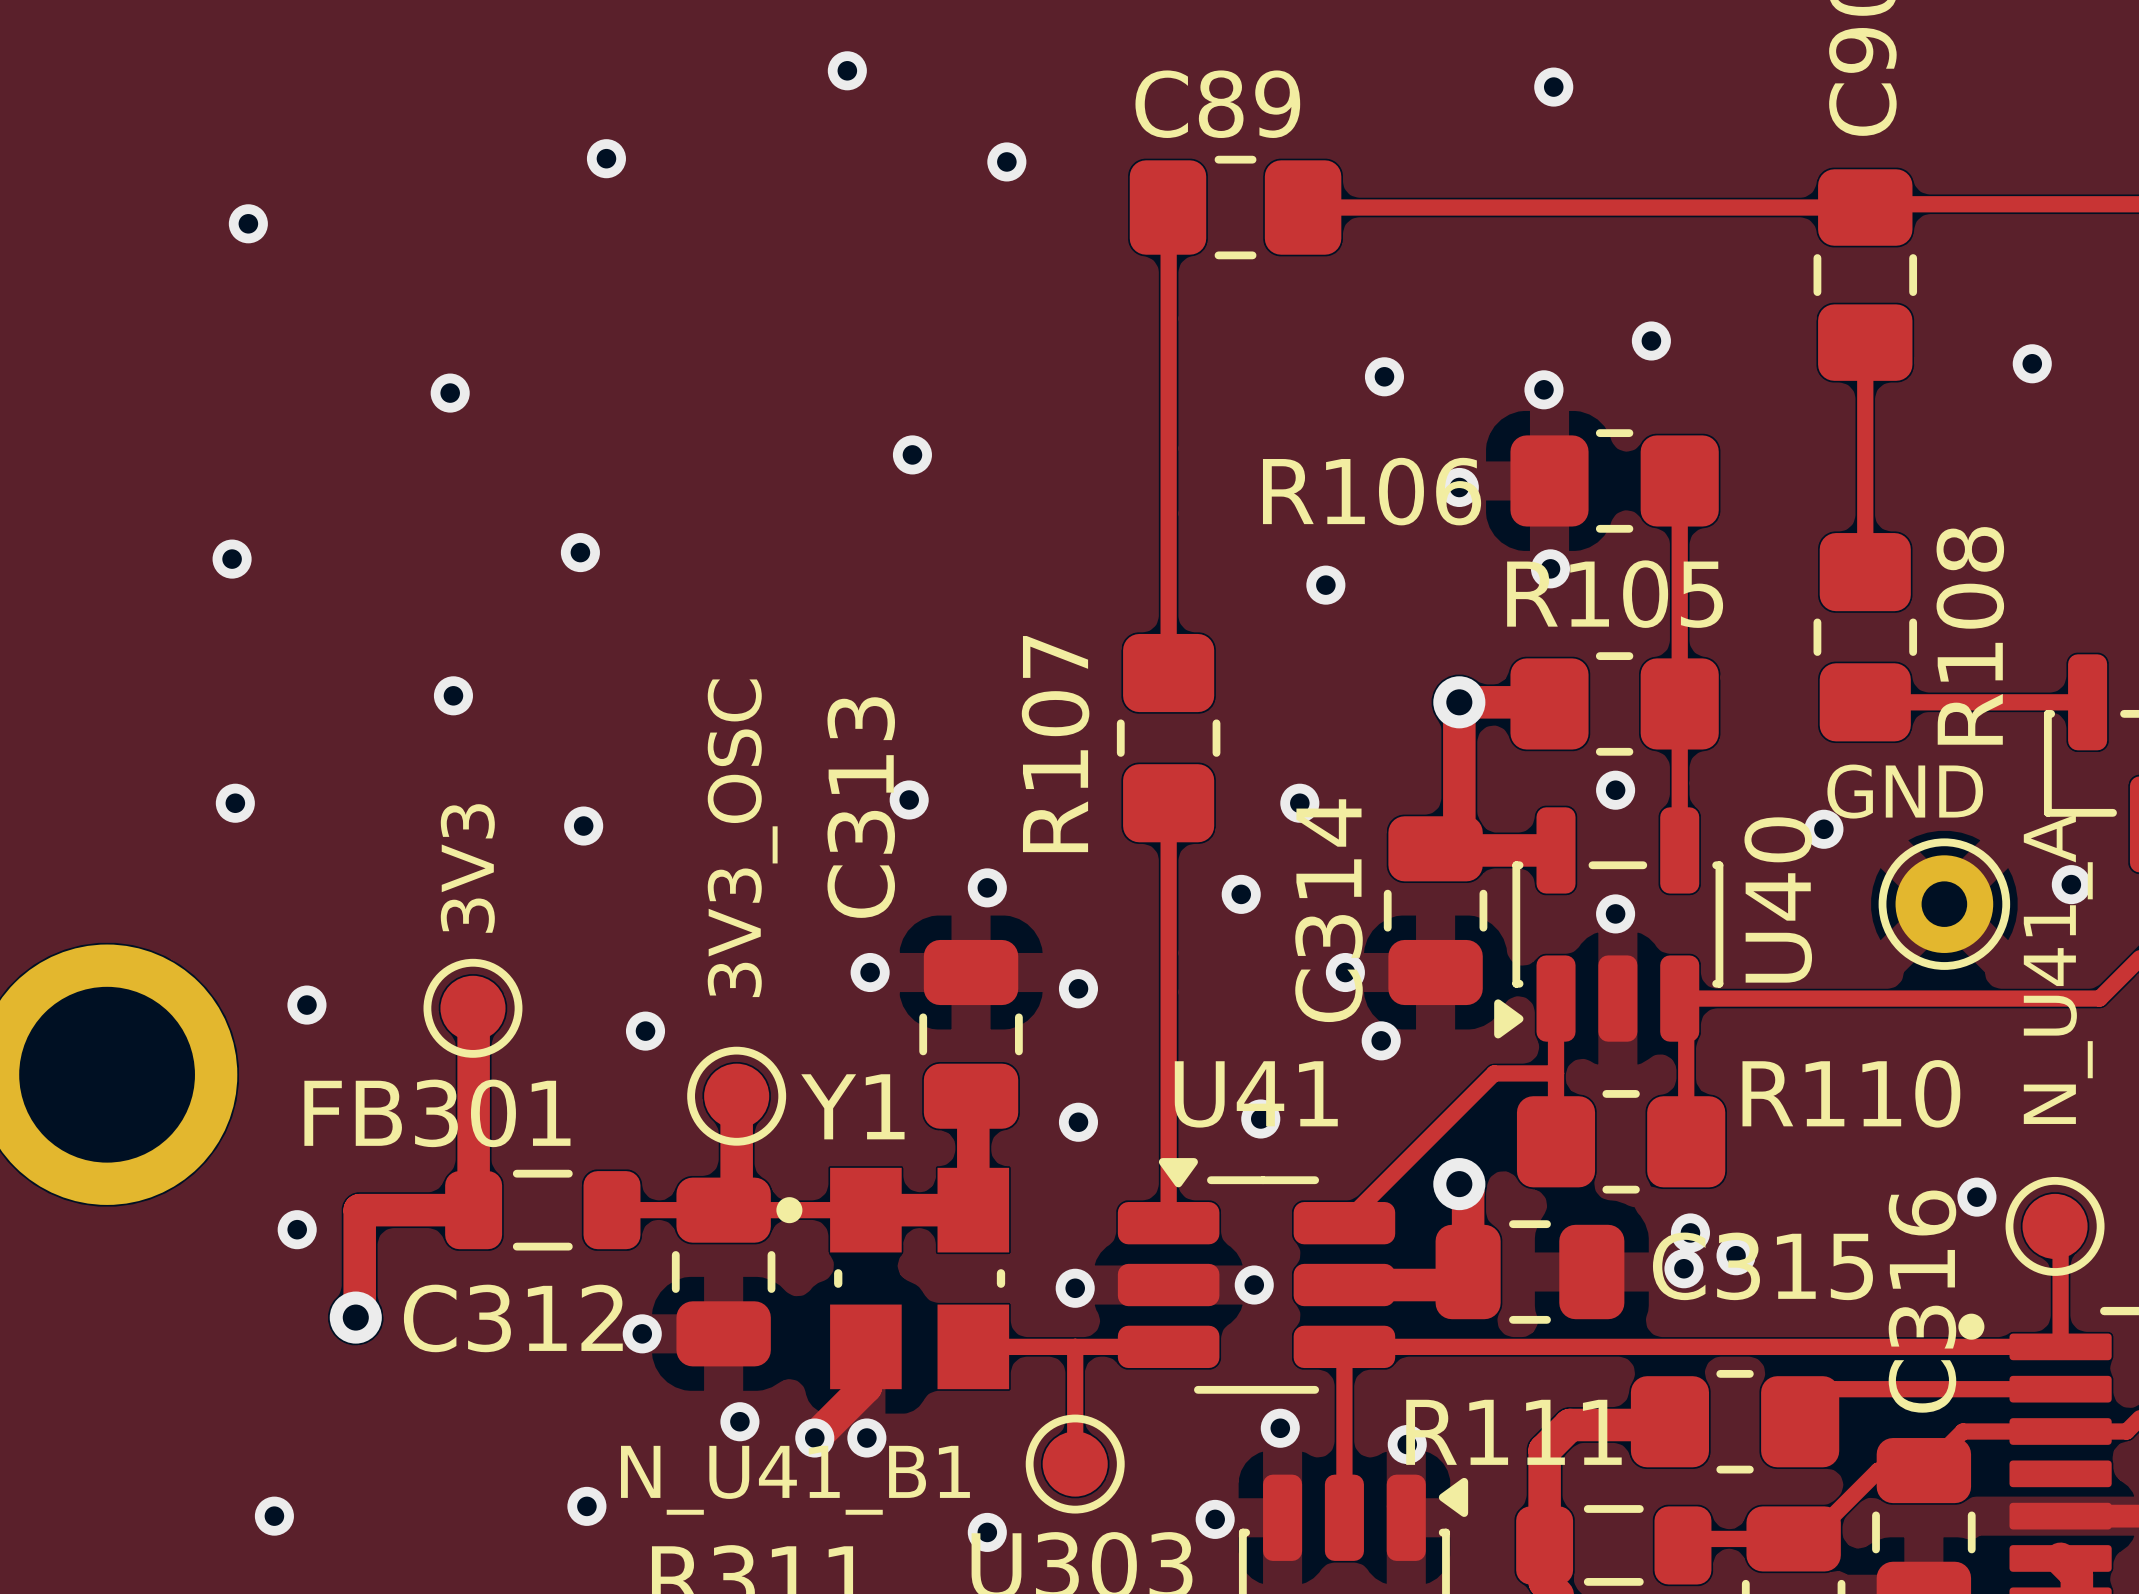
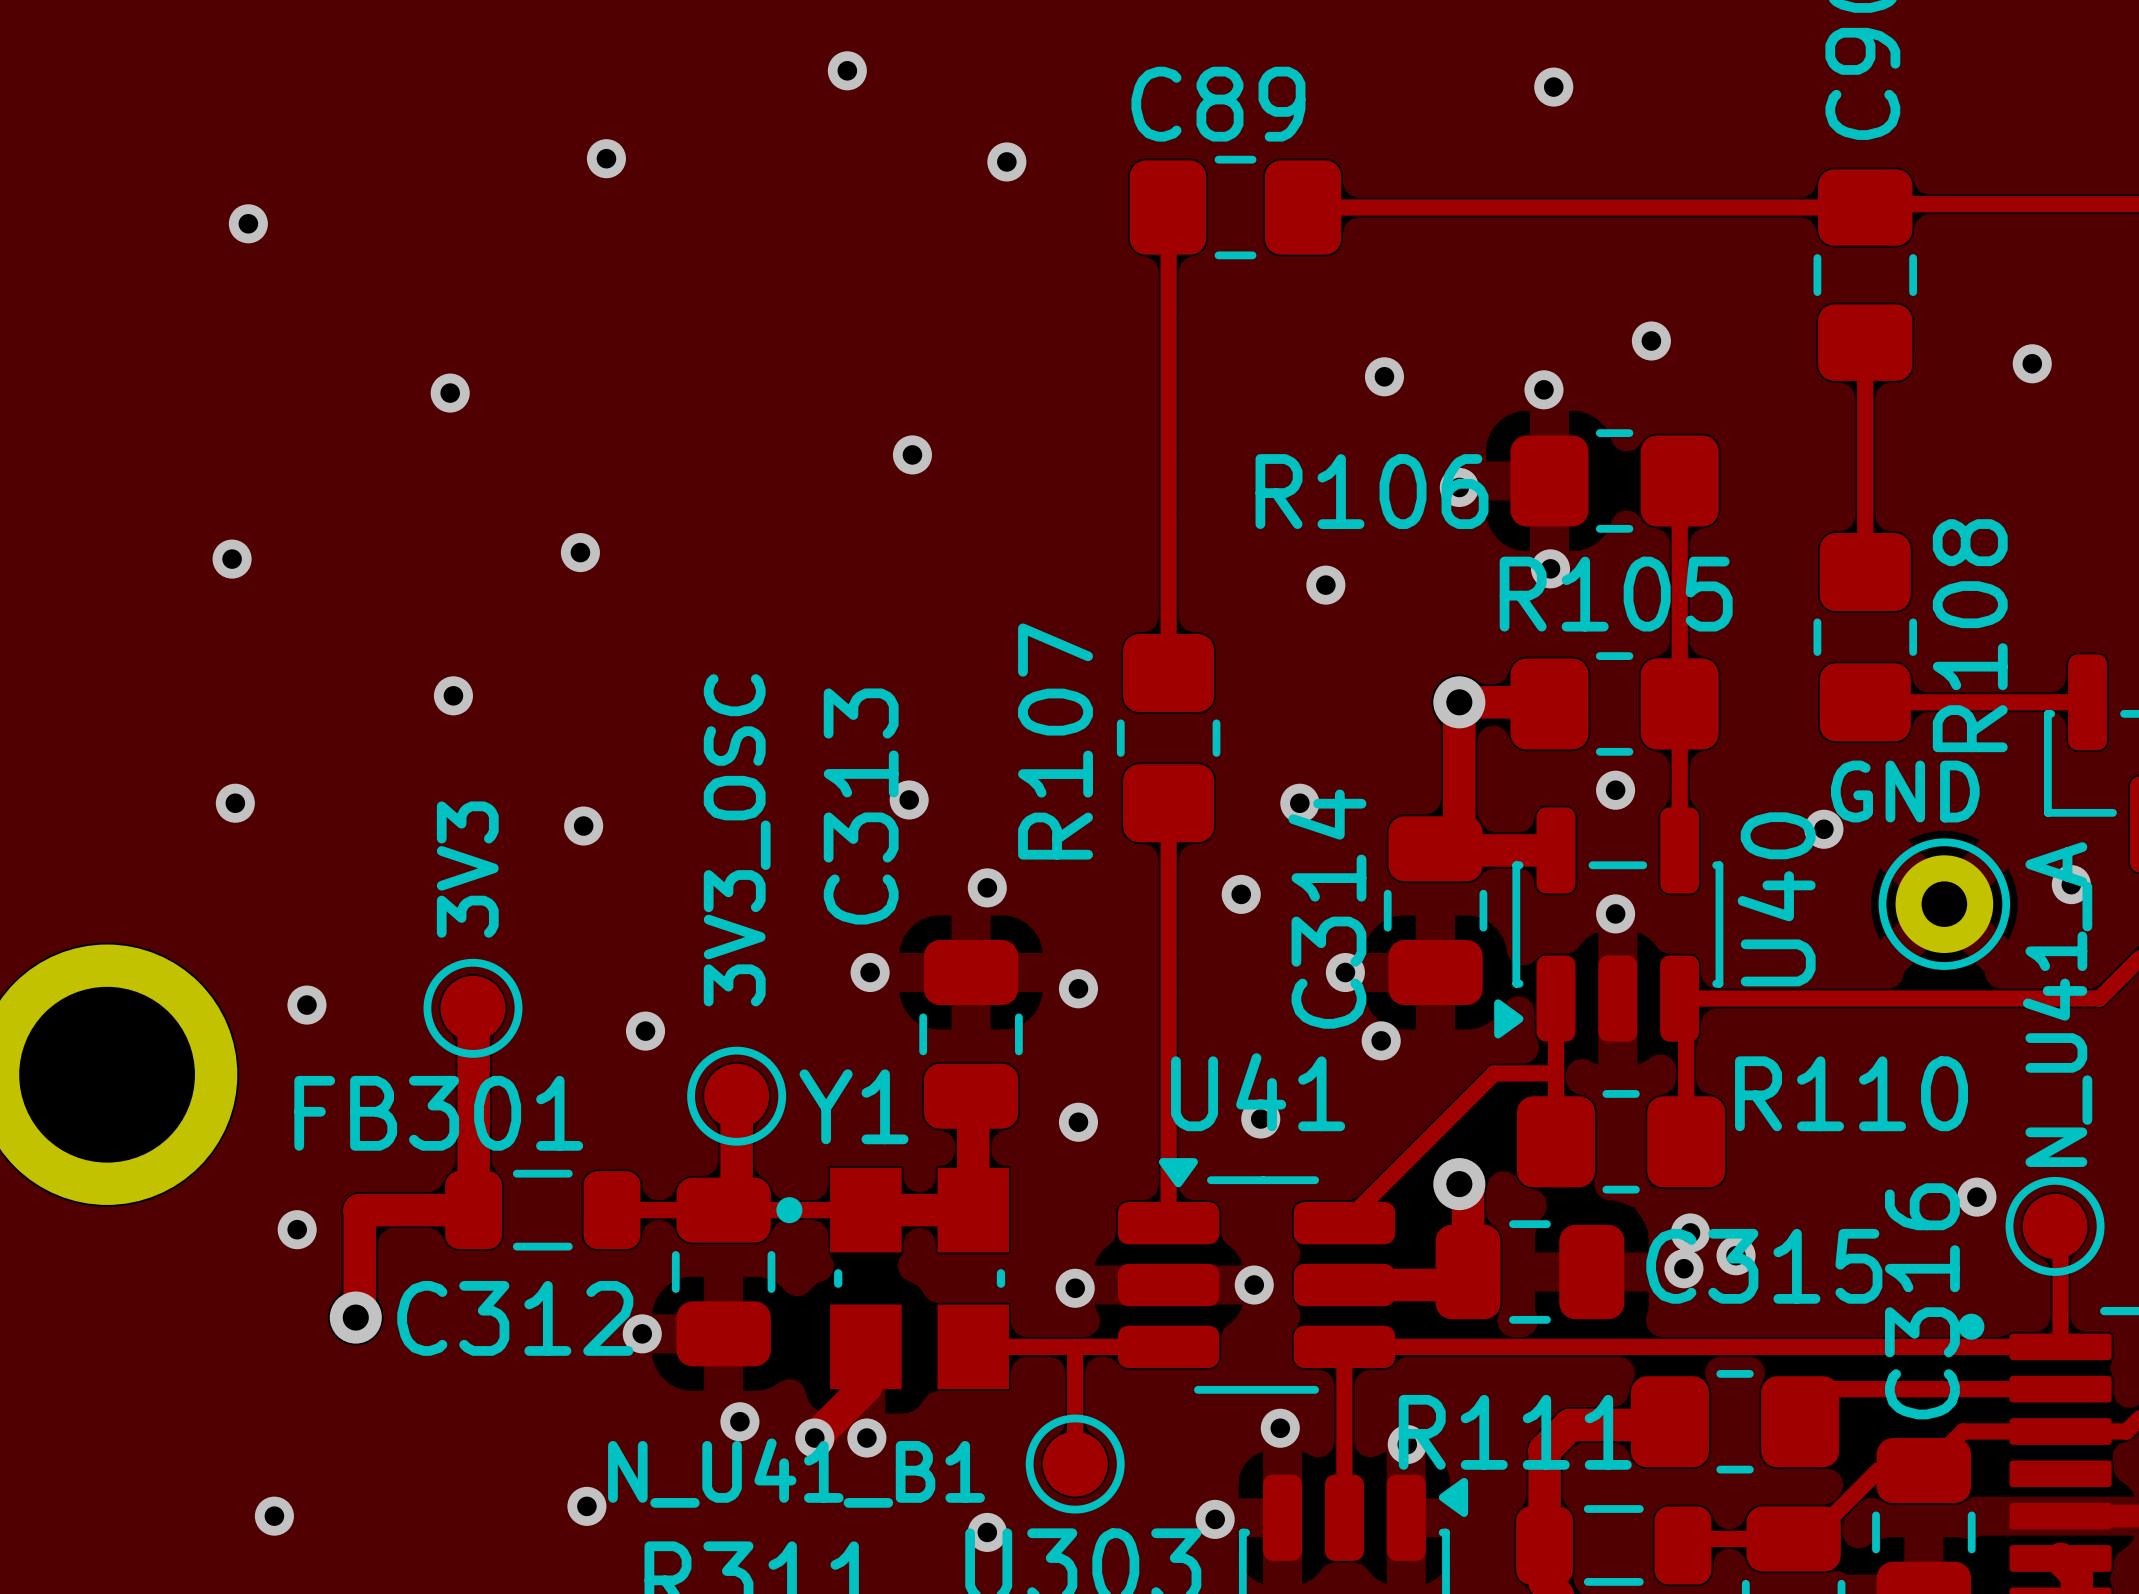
part value position: N_U41_A (2058, 969) -> N_U41_A (2057, 1004)

